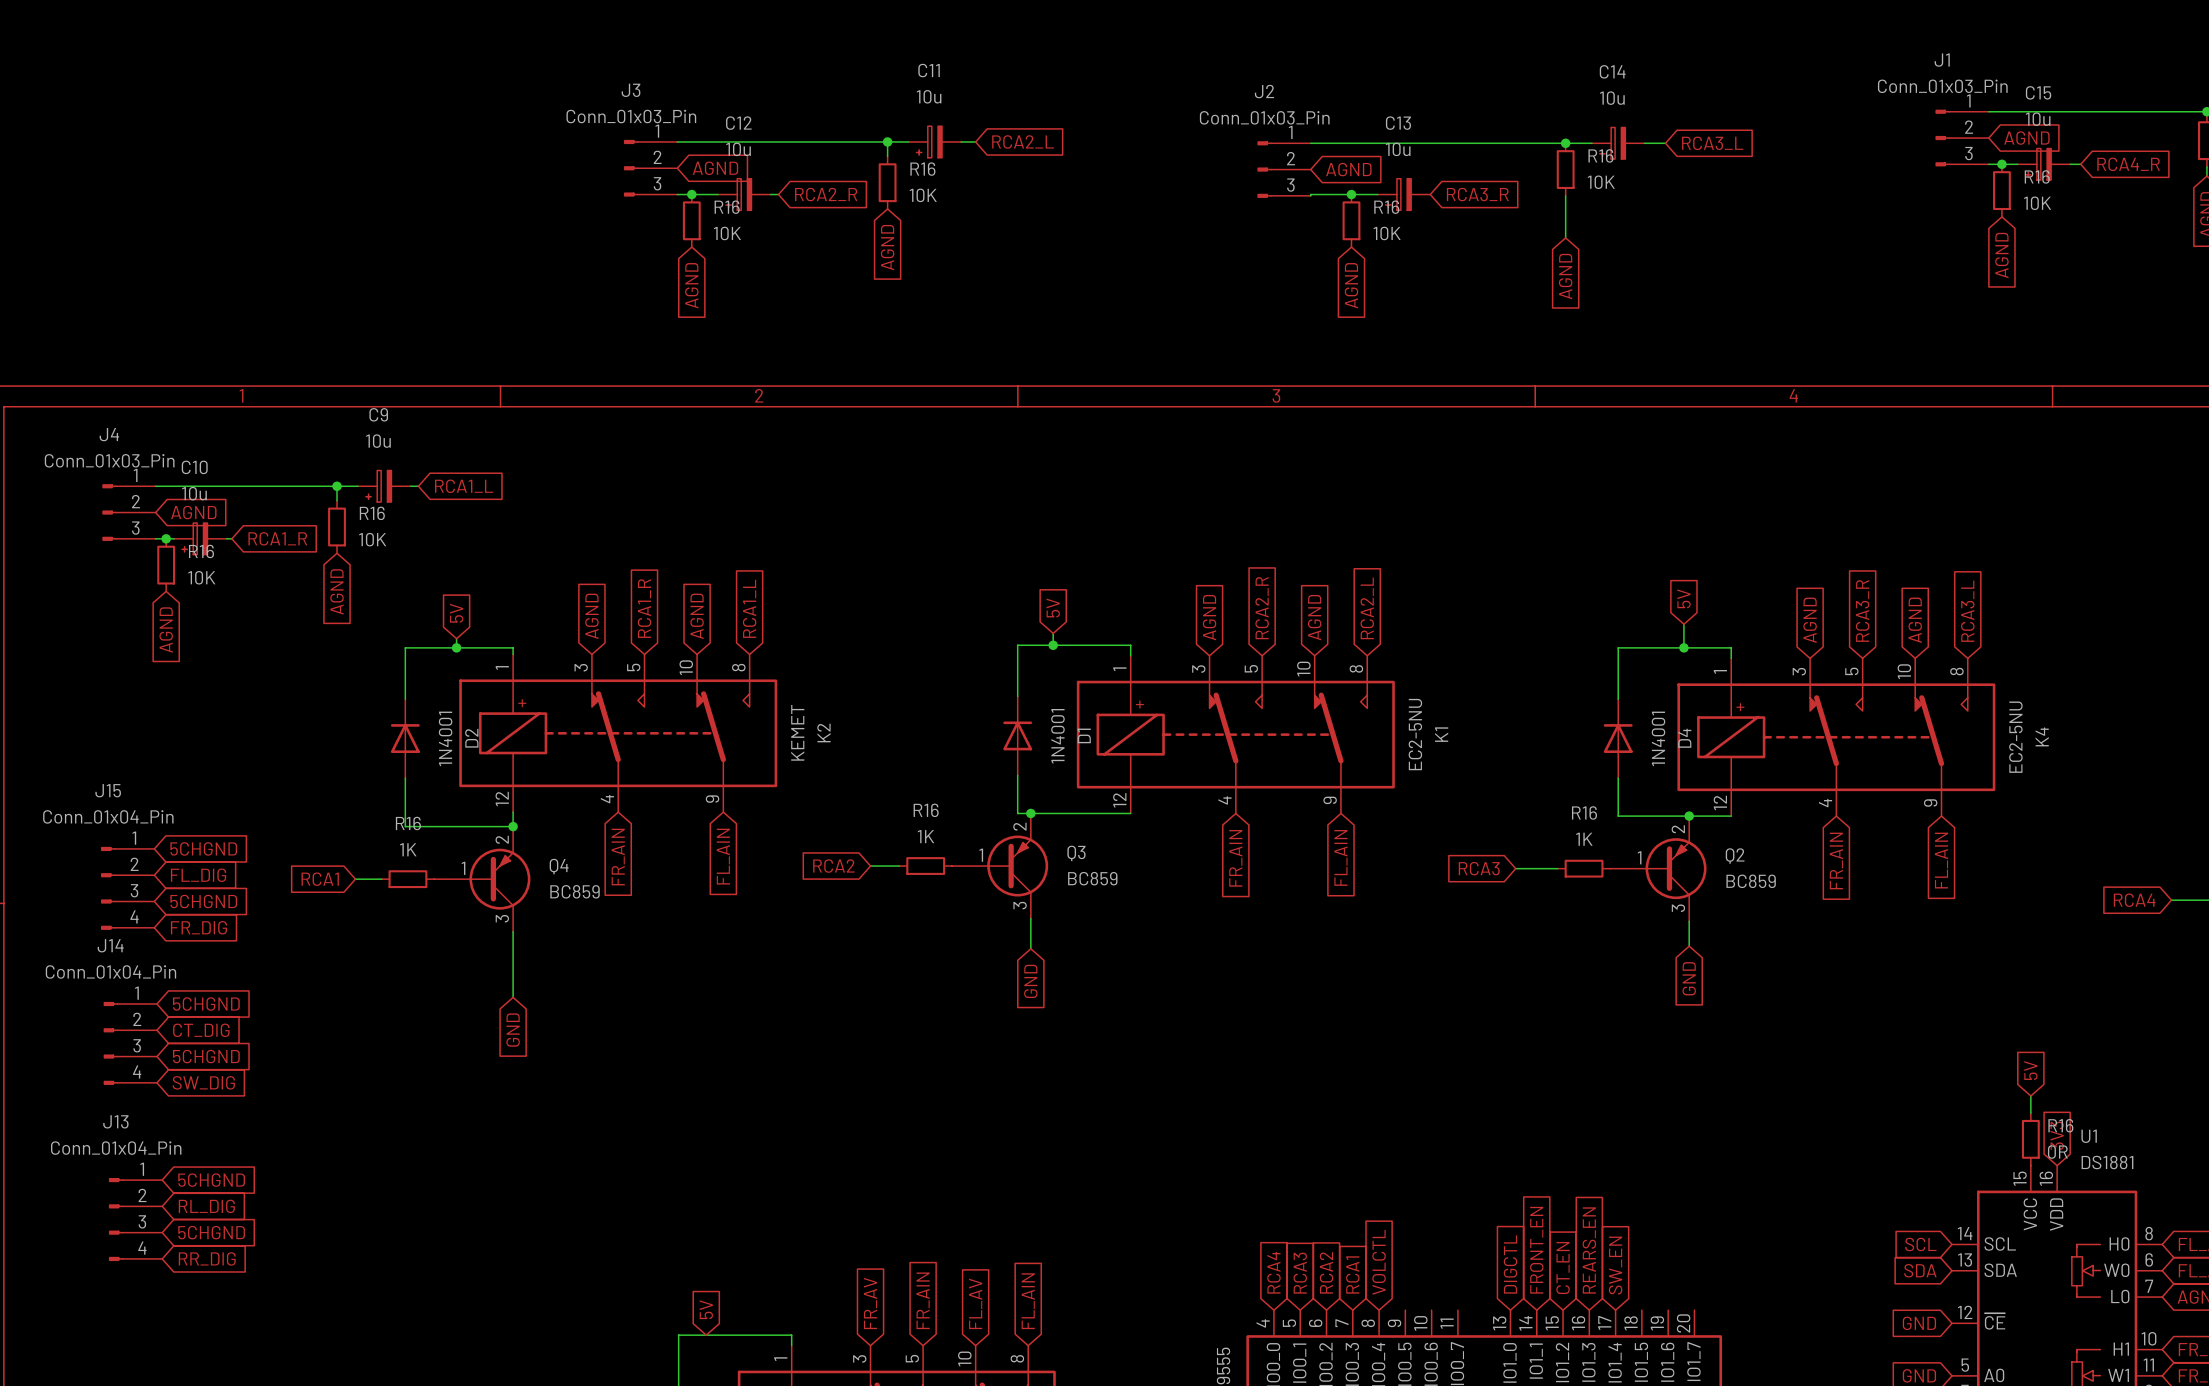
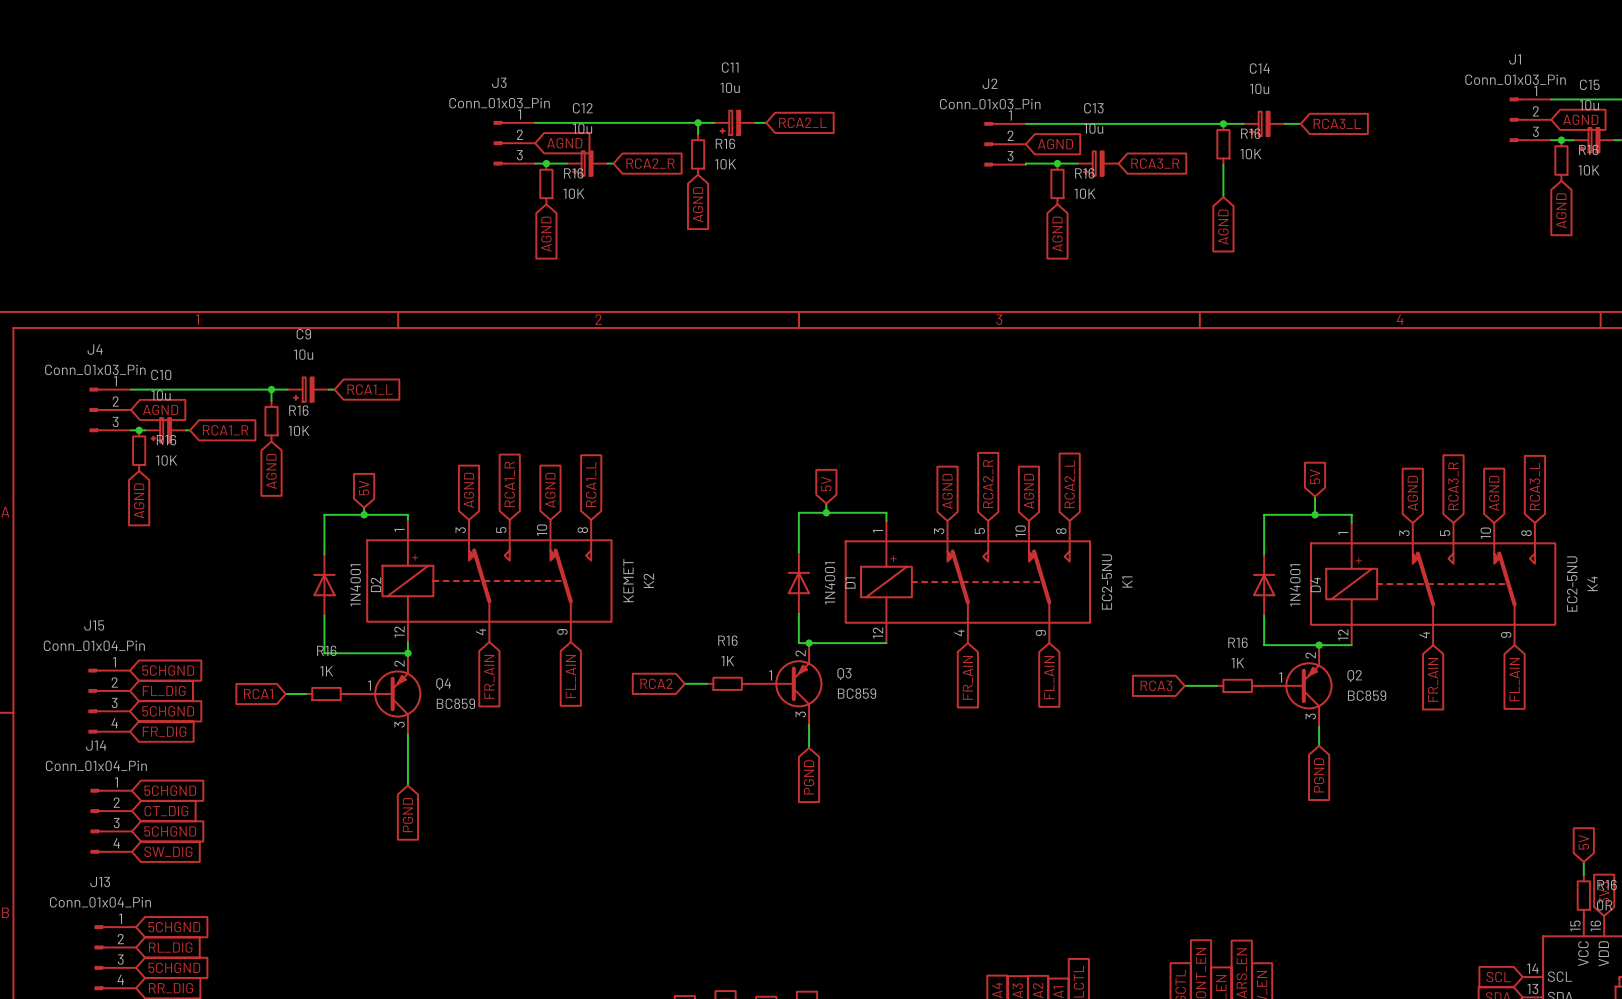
global label: GND (1689, 978) -> PGND (1319, 775)
global label: GND (1030, 981) -> PGND (809, 777)
global label: GND (513, 1030) -> PGND (407, 815)

